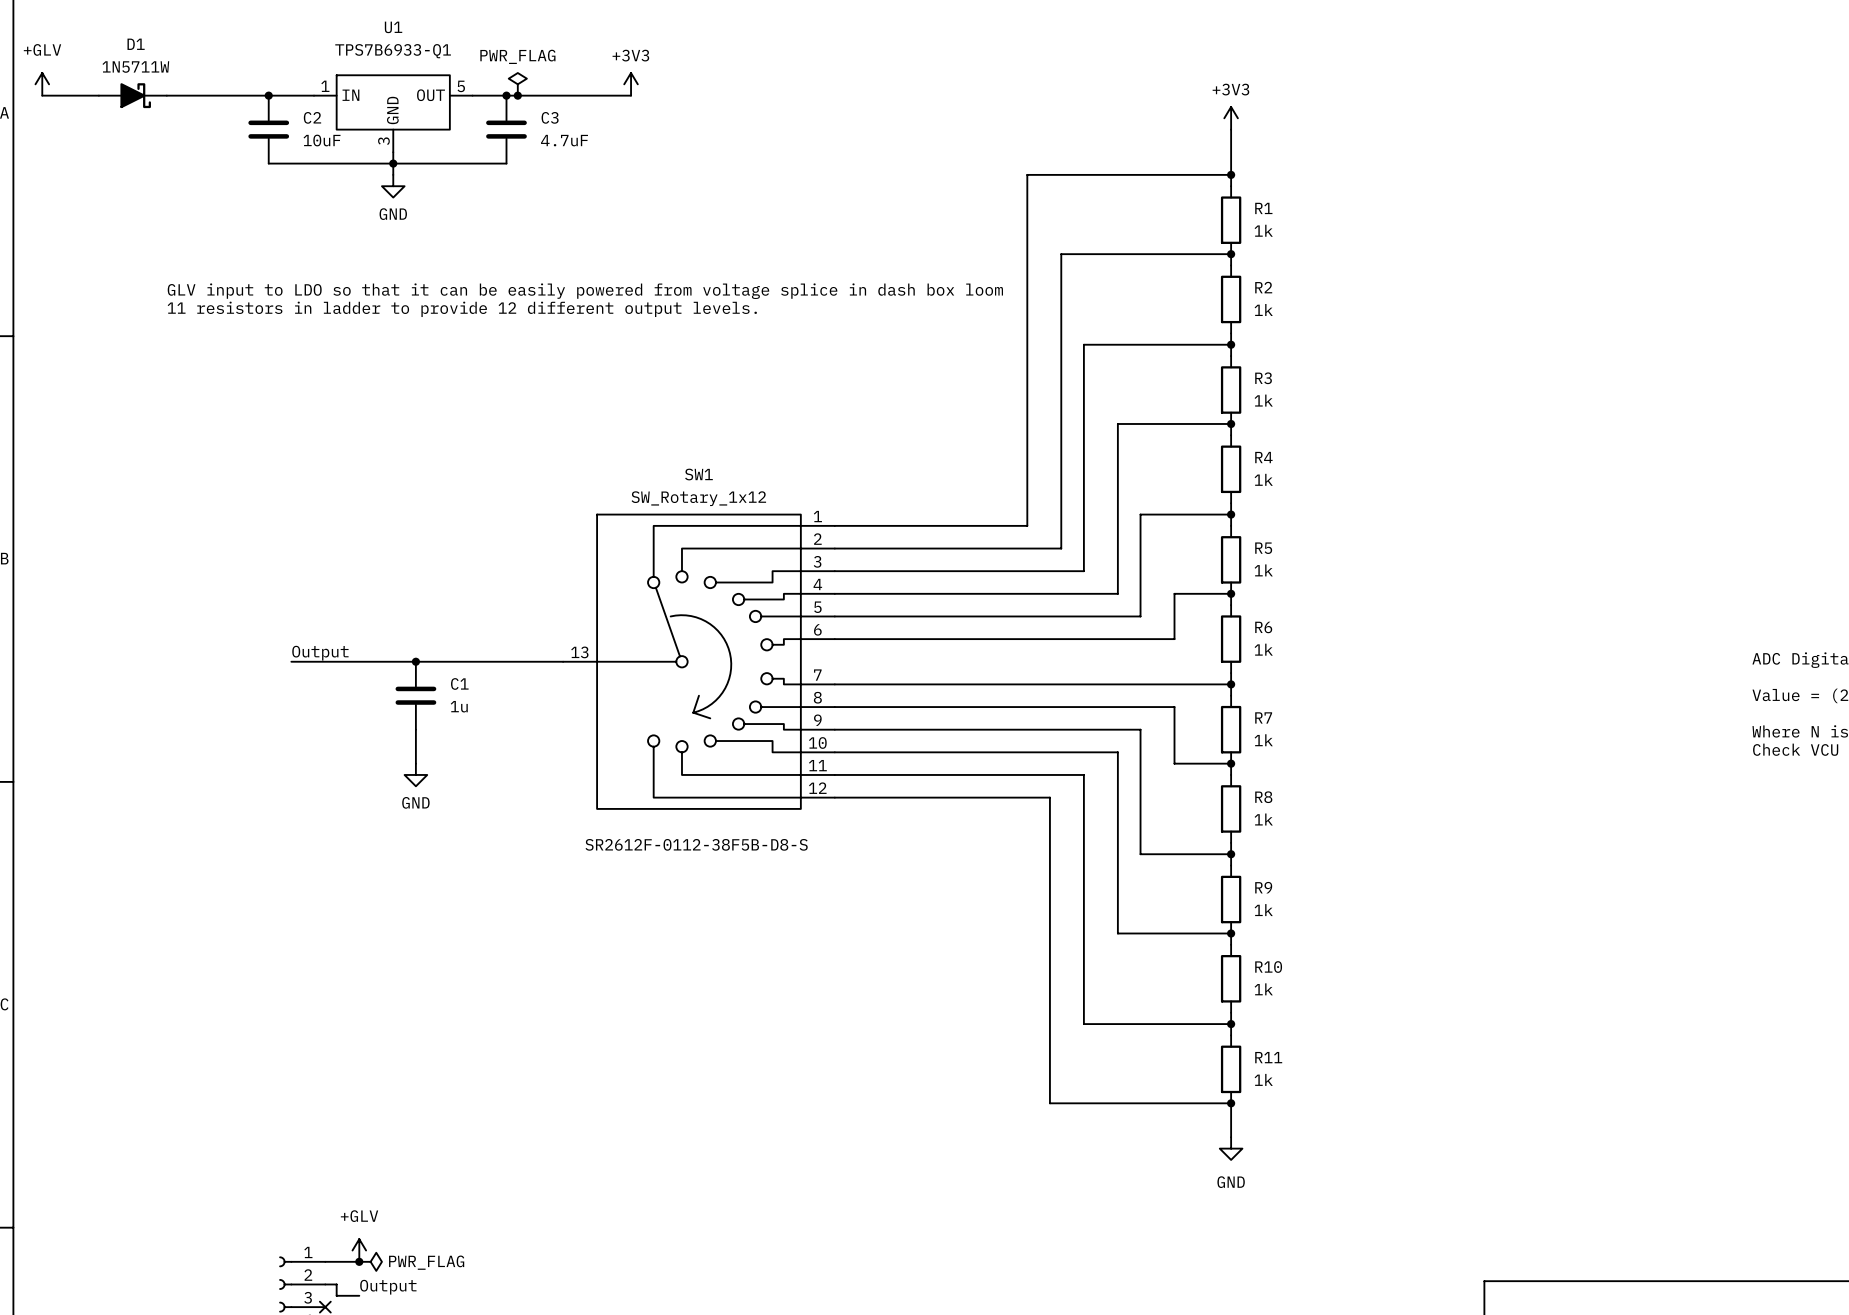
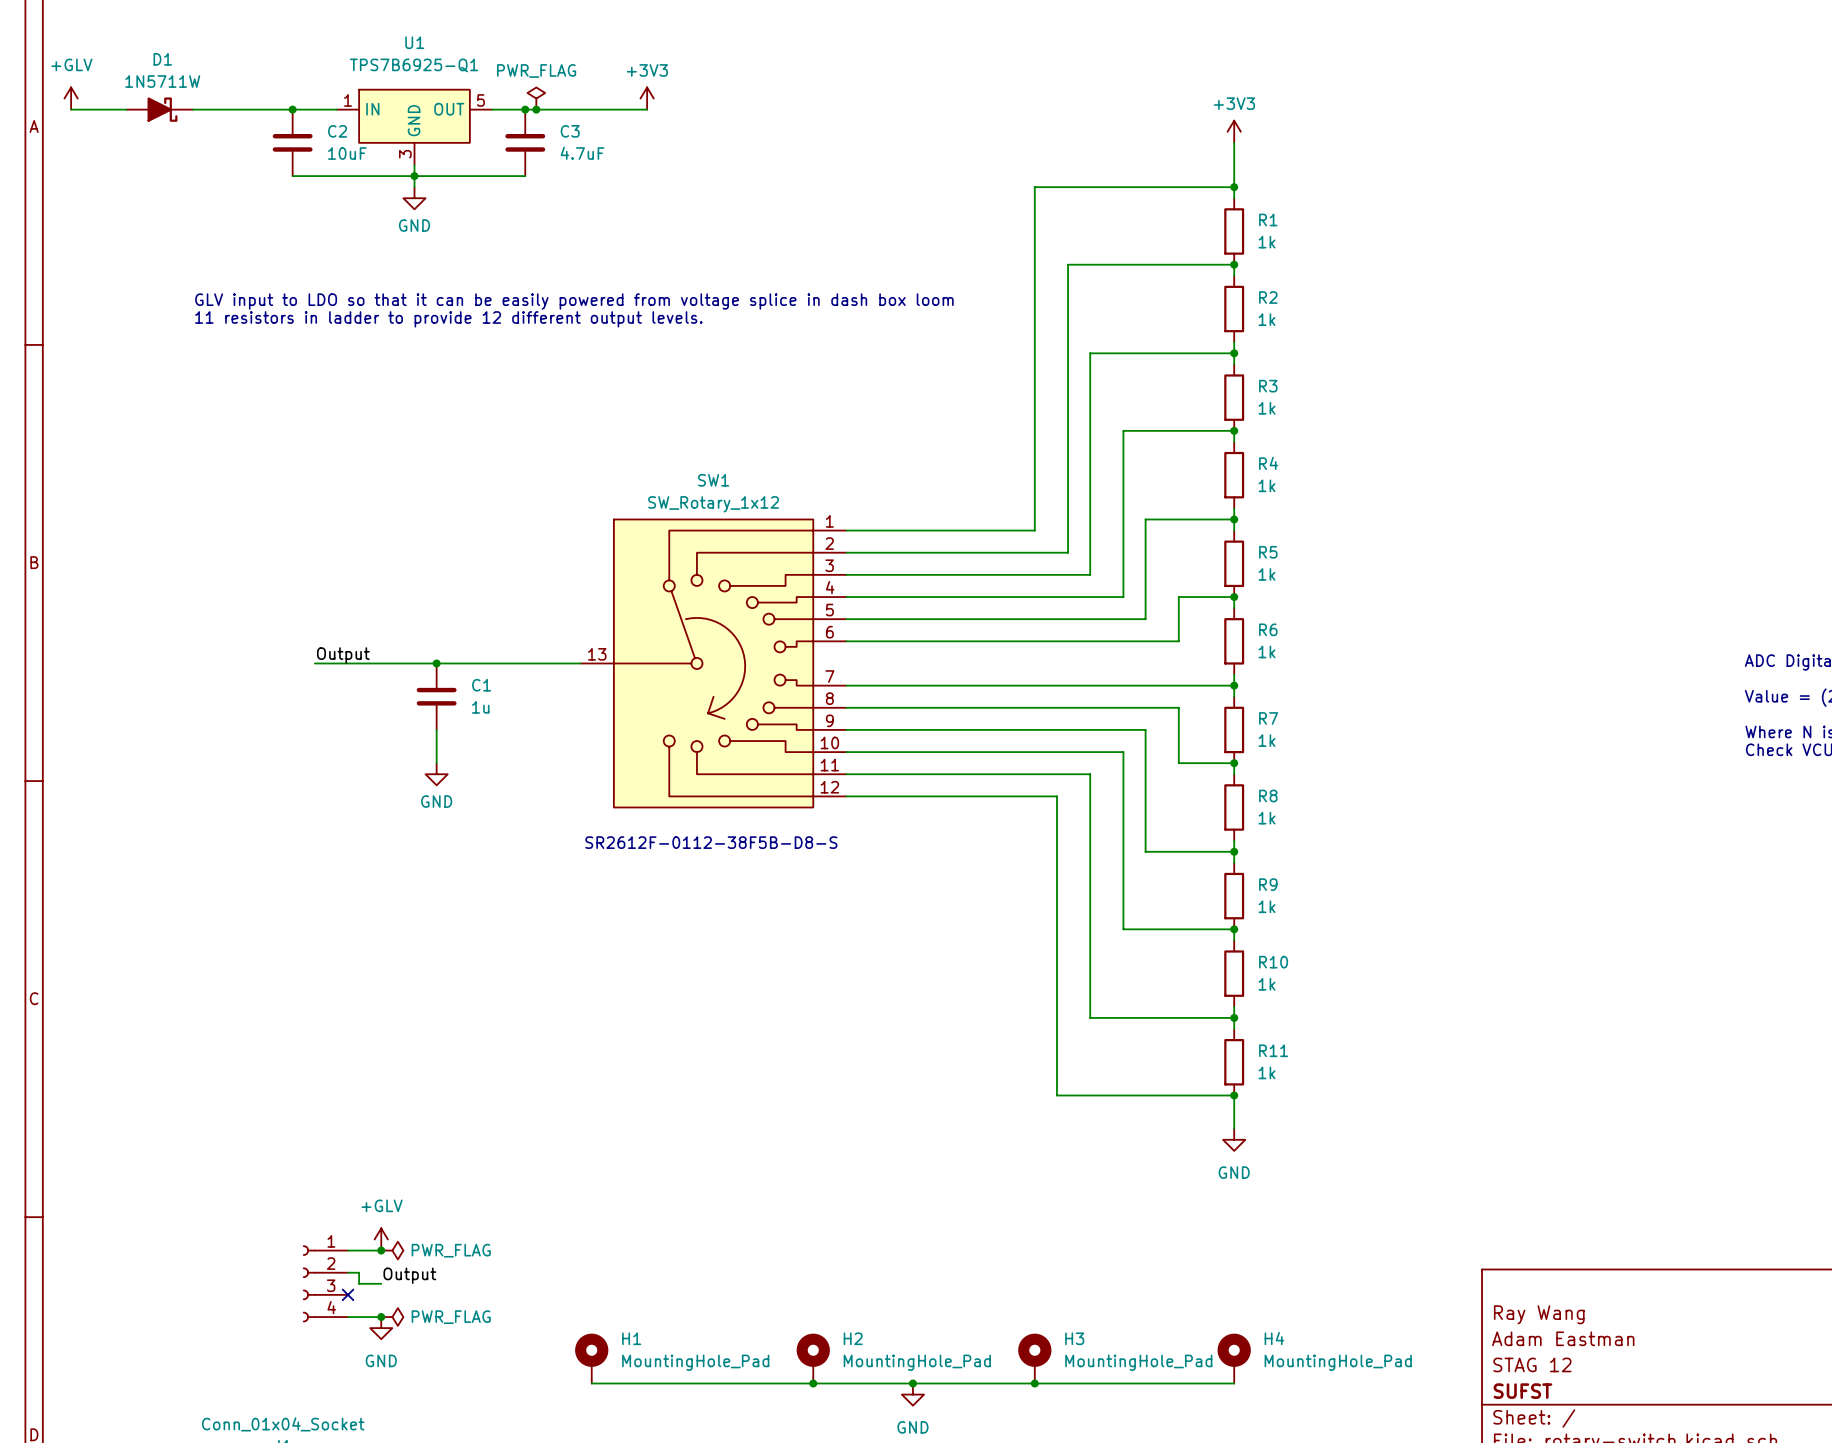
U1 value: TPS7B6933-Q1 (393, 51) -> TPS7B6925-Q1 (413, 65)

